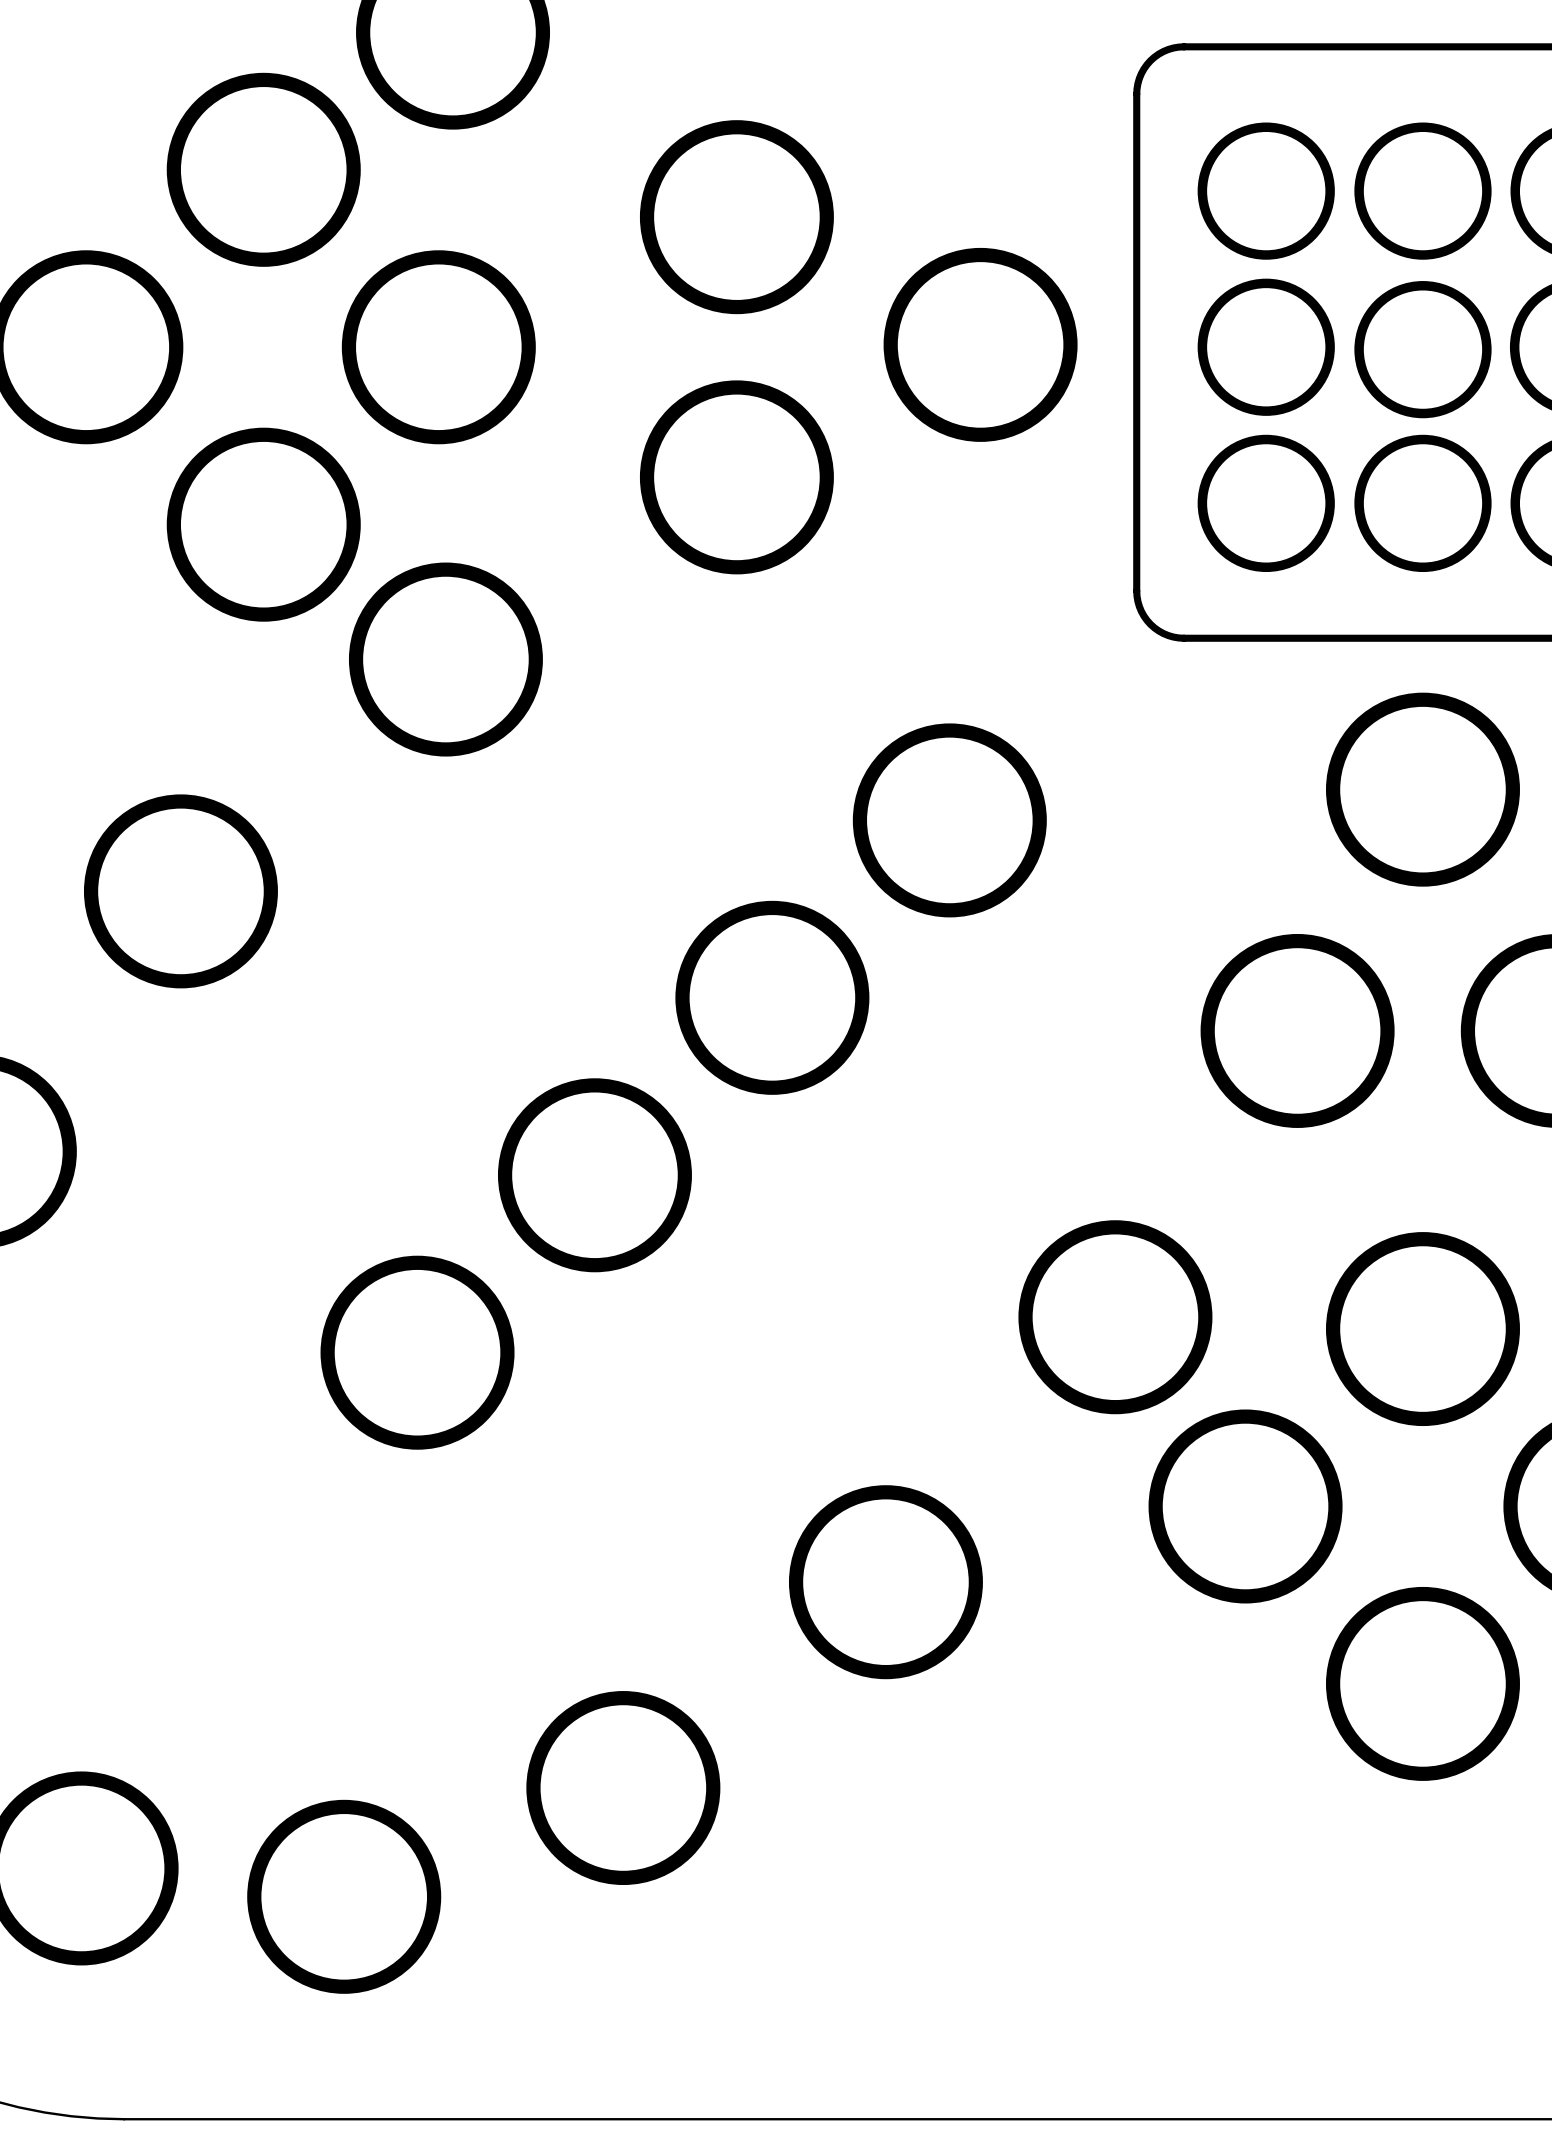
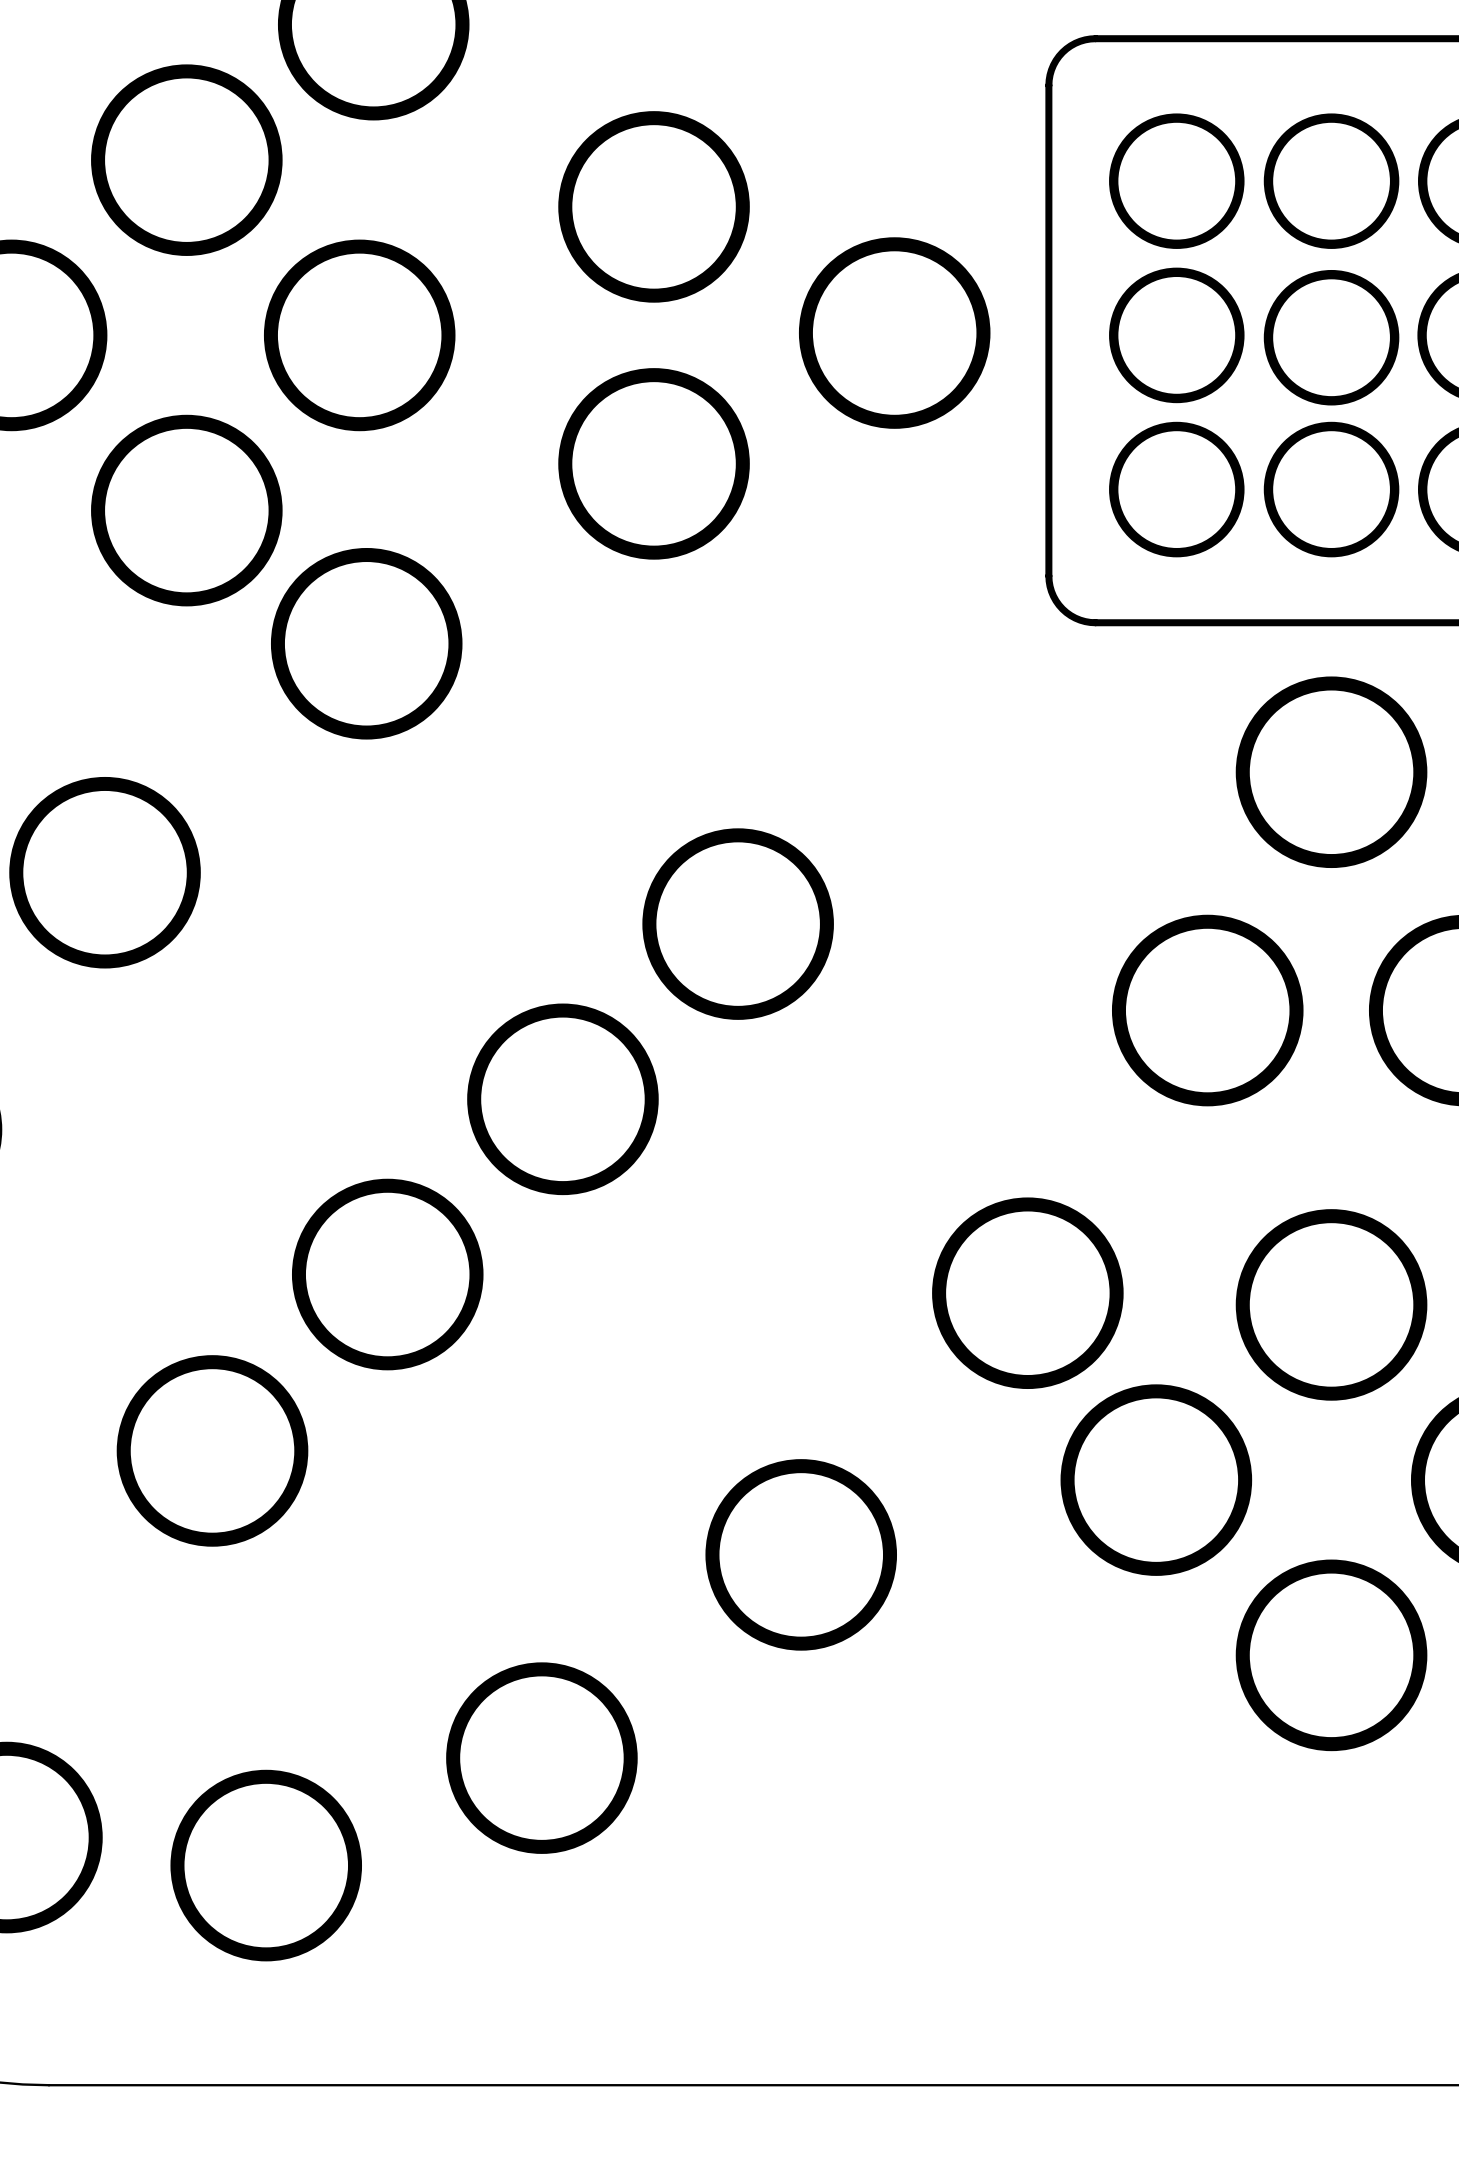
part: (949, 820) -> none
part position: (772, 997) -> (738, 924)
part position: (594, 1175) -> (562, 1099)
part position: (417, 1352) -> (387, 1274)
part: none -> (212, 1450)

